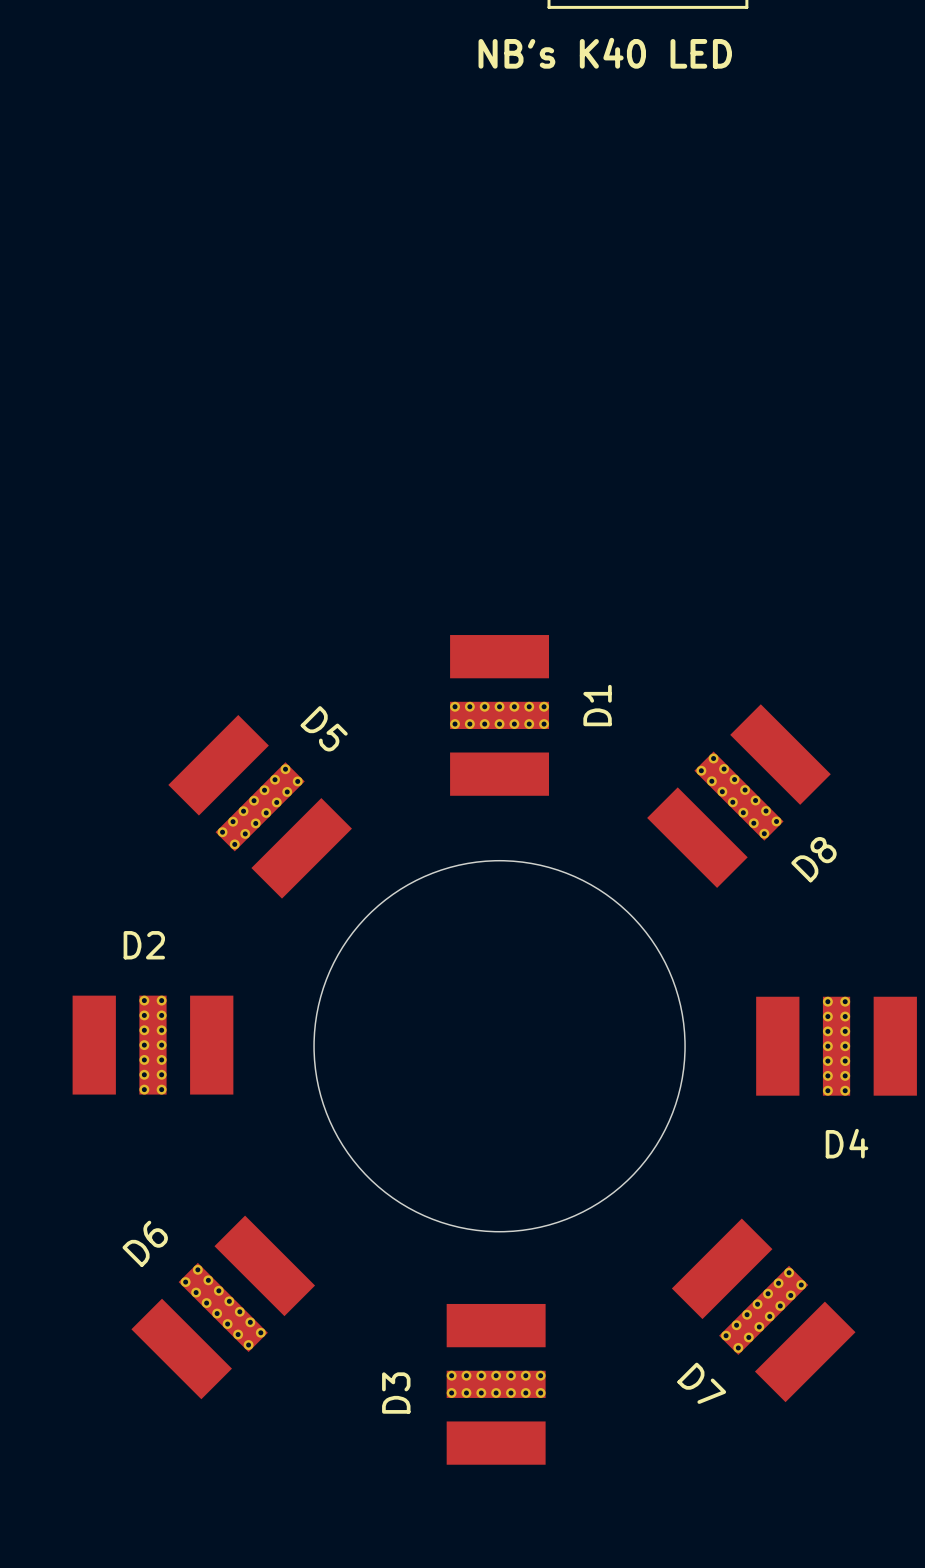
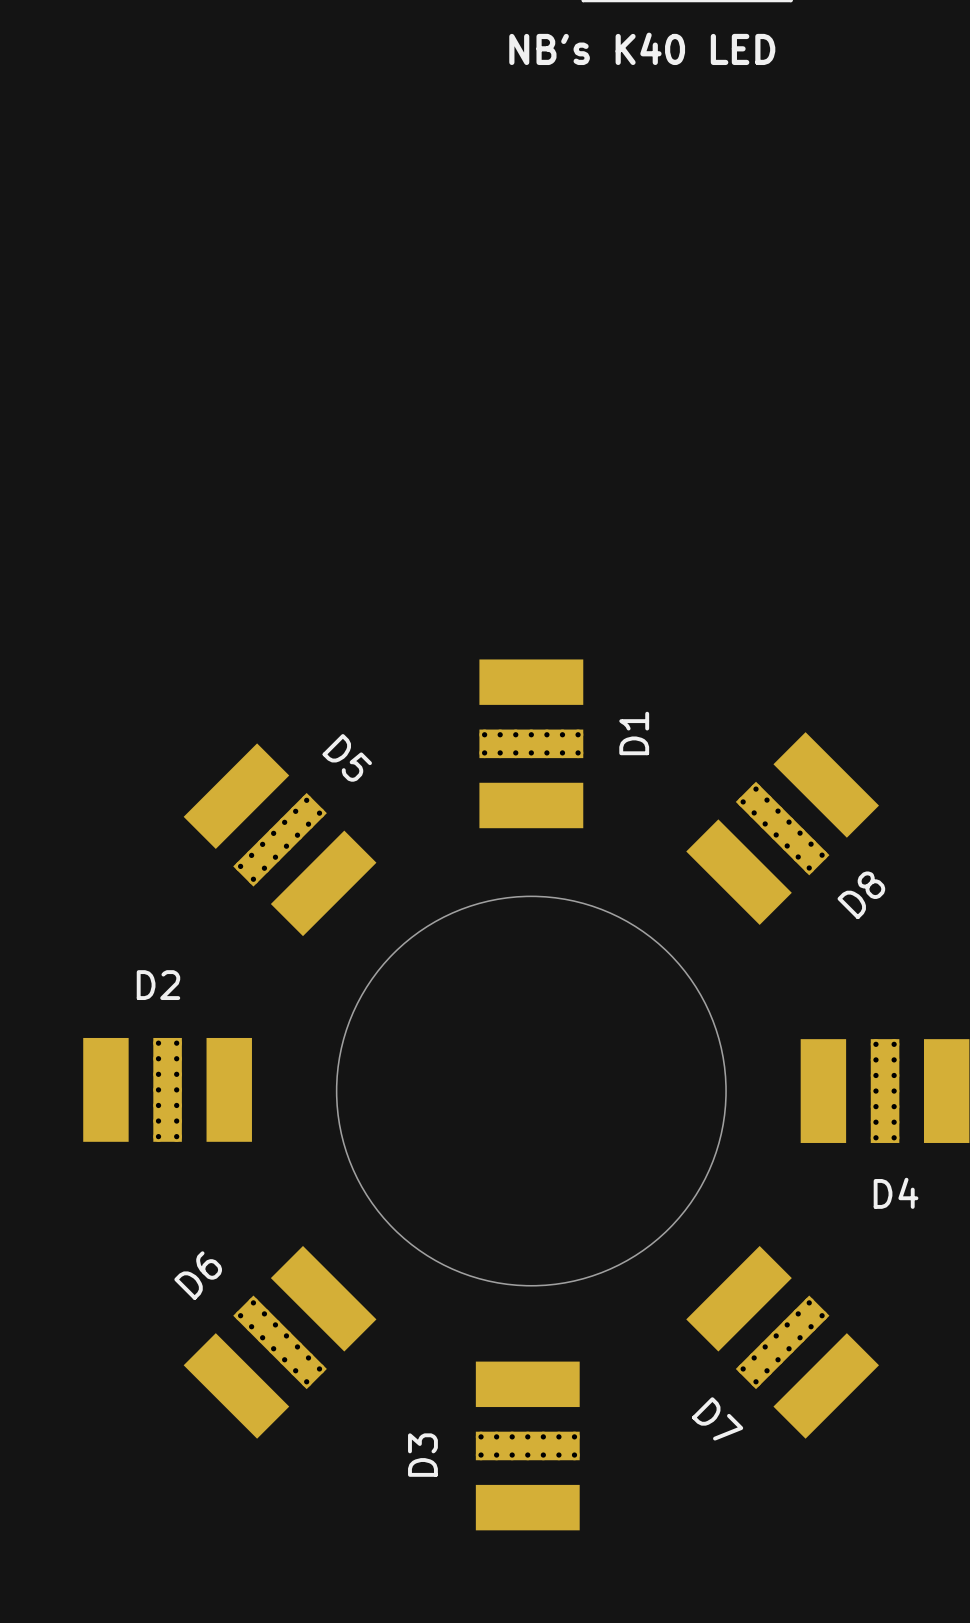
D6 position: (223, 1307) -> (280, 1342)
D7 position: (763, 1310) -> (782, 1342)

